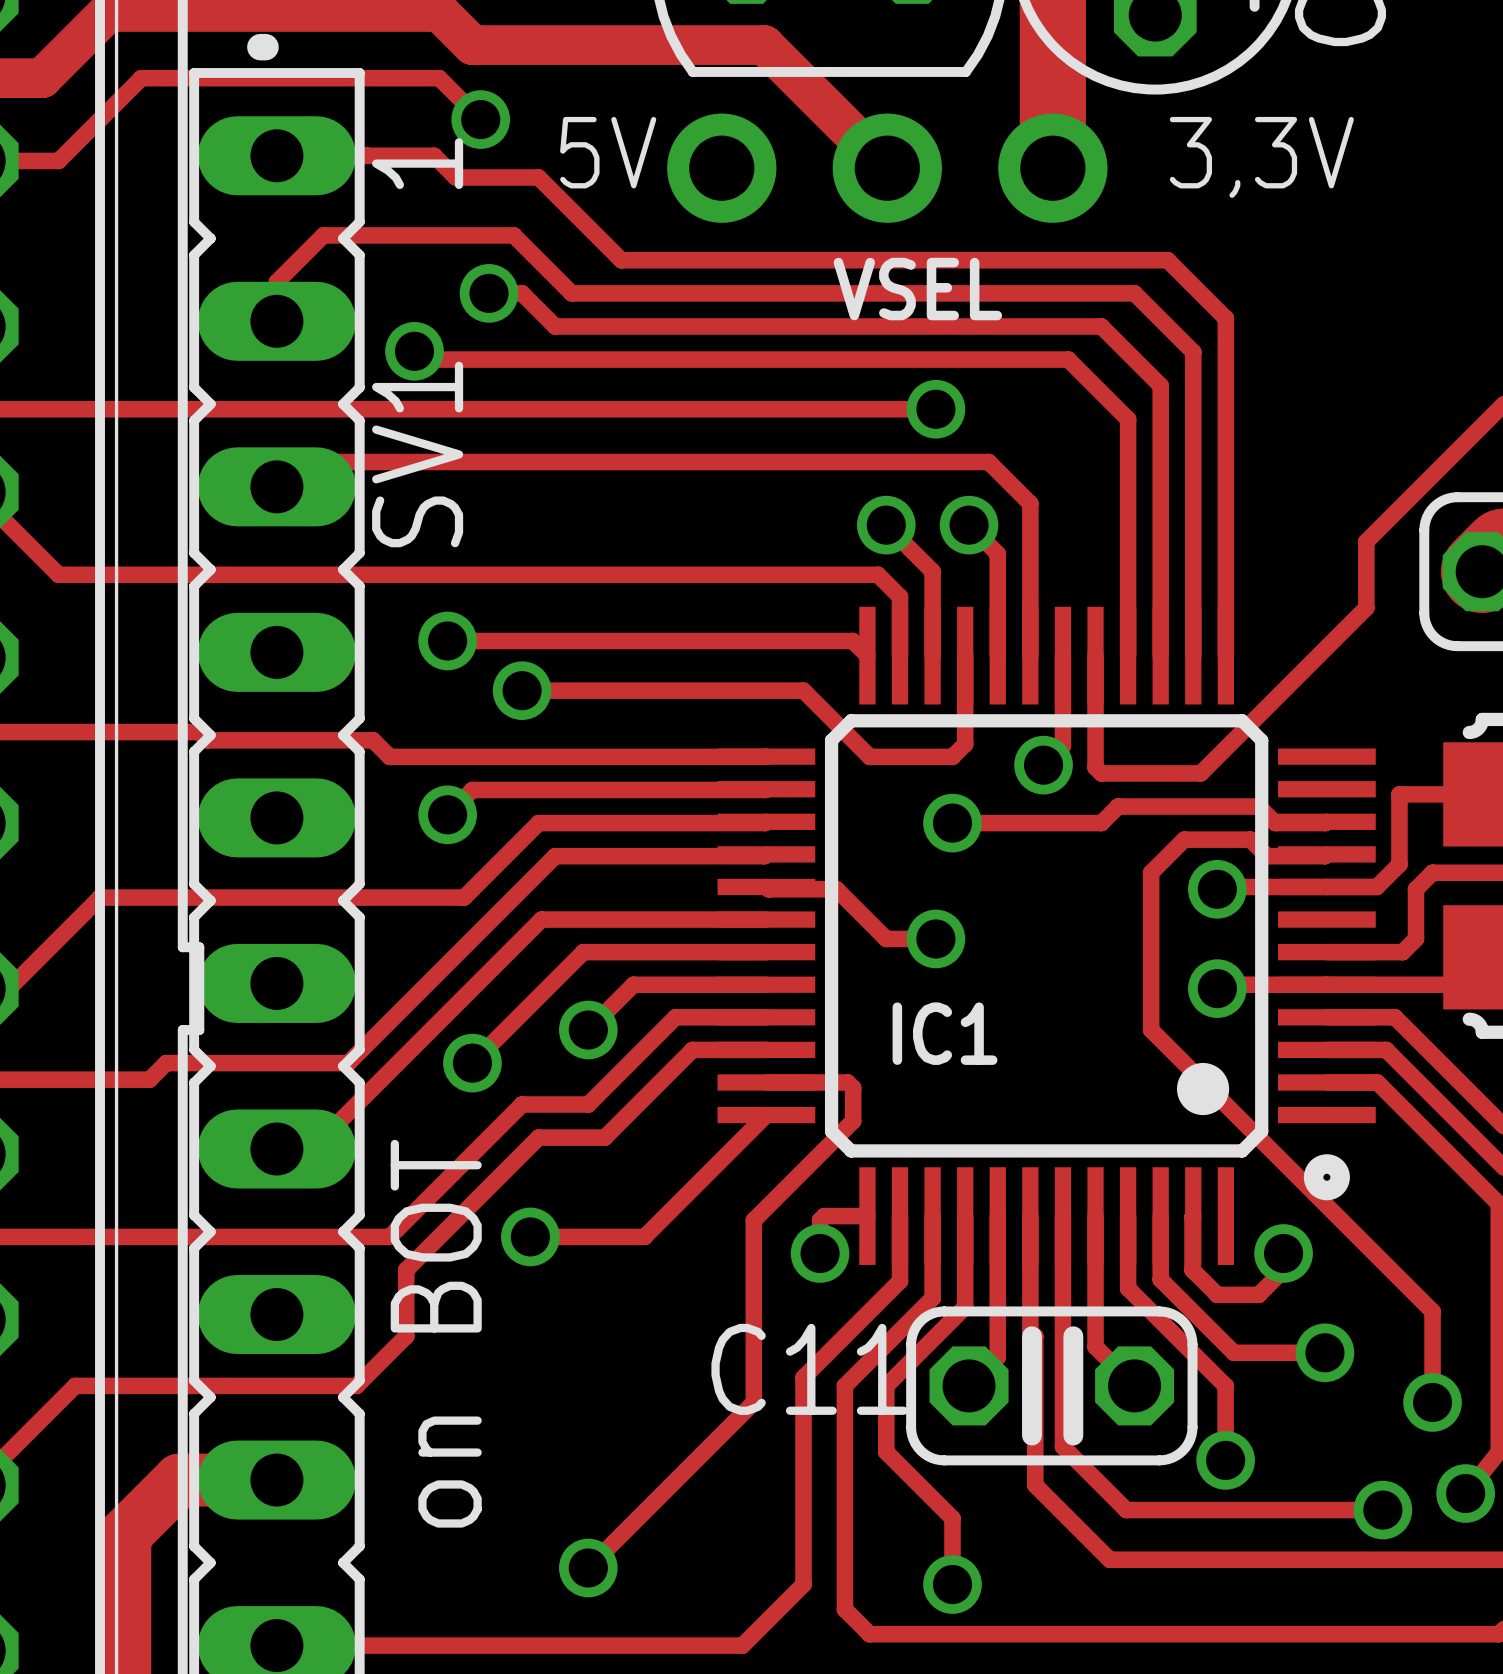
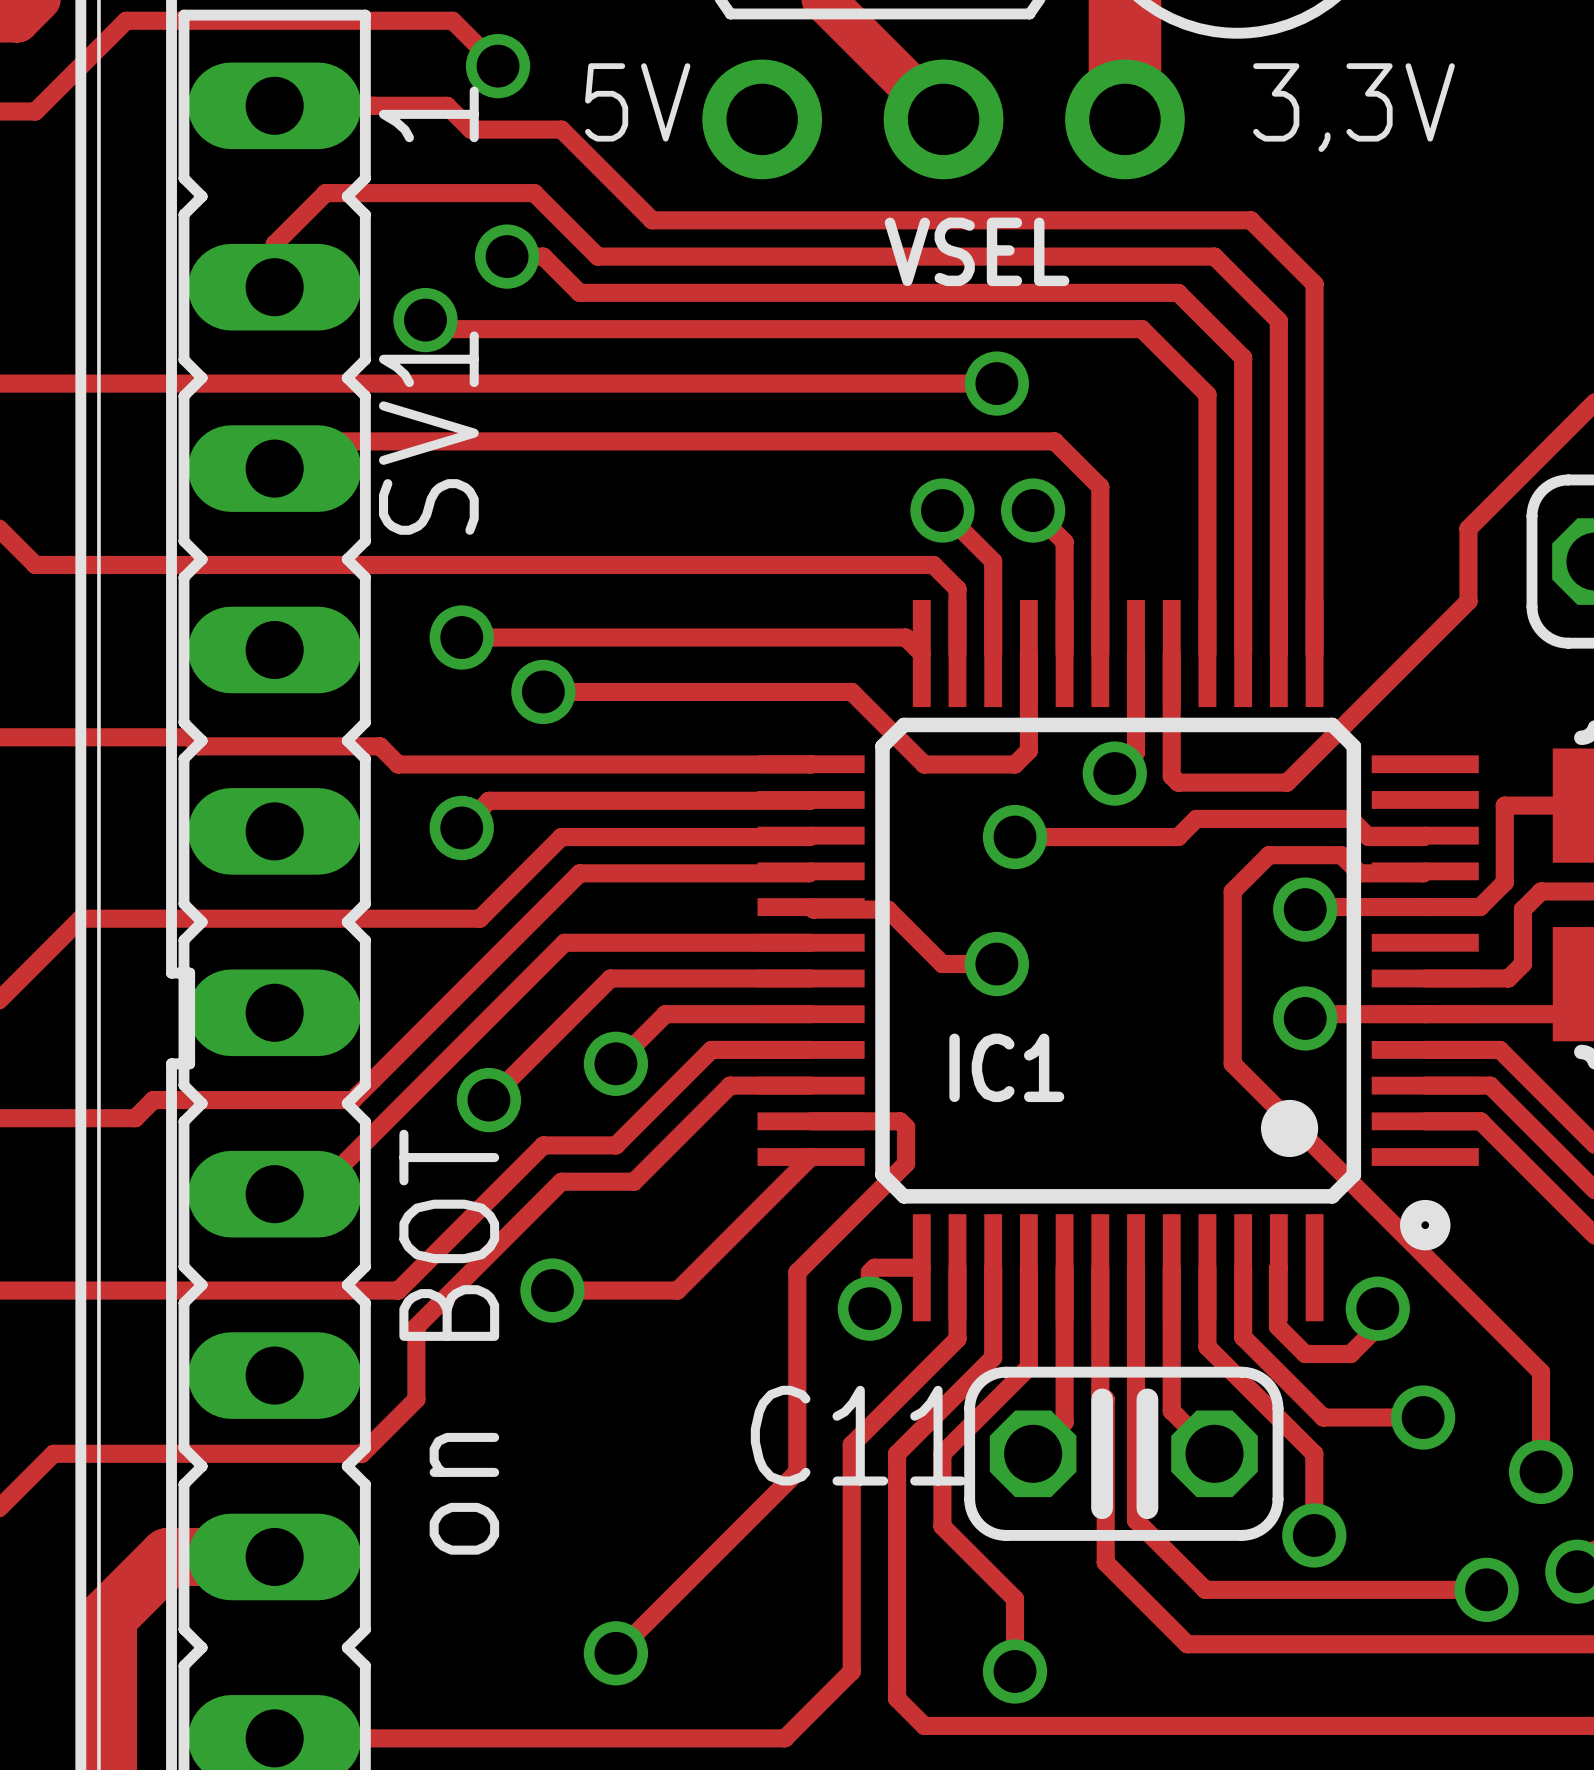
text position: on BOT (436, 1333) -> on BOT (449, 1342)

